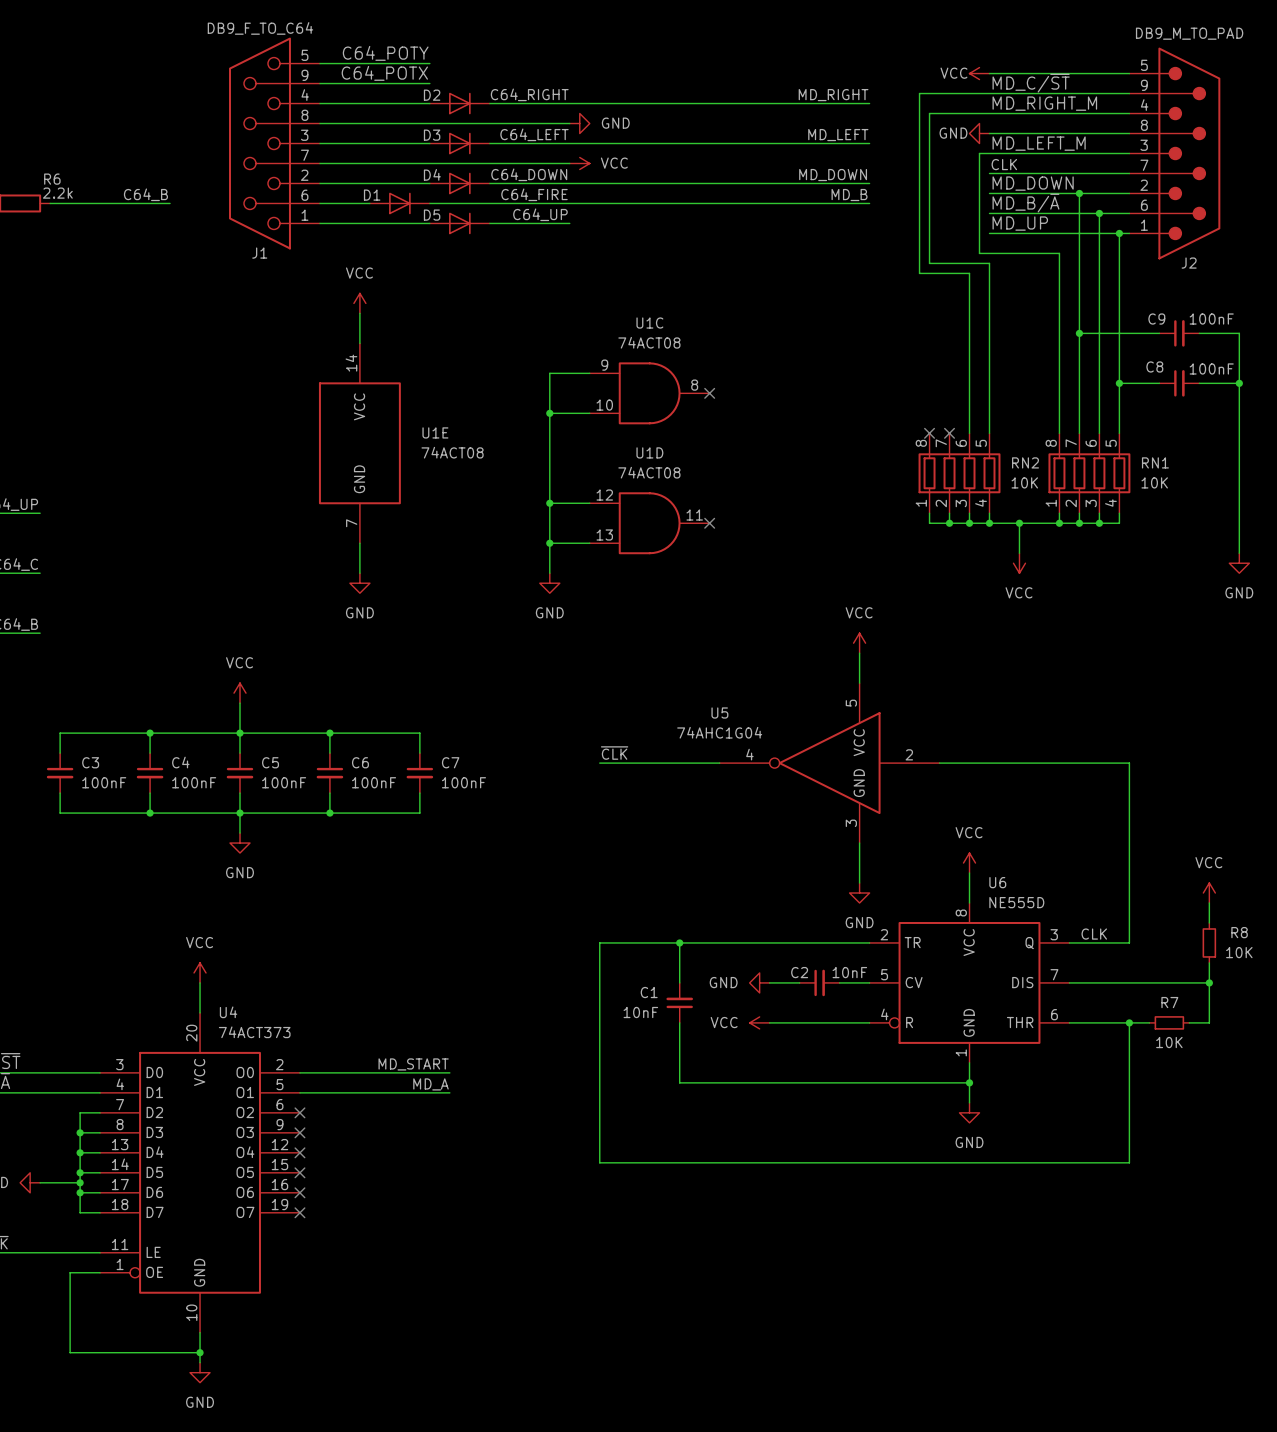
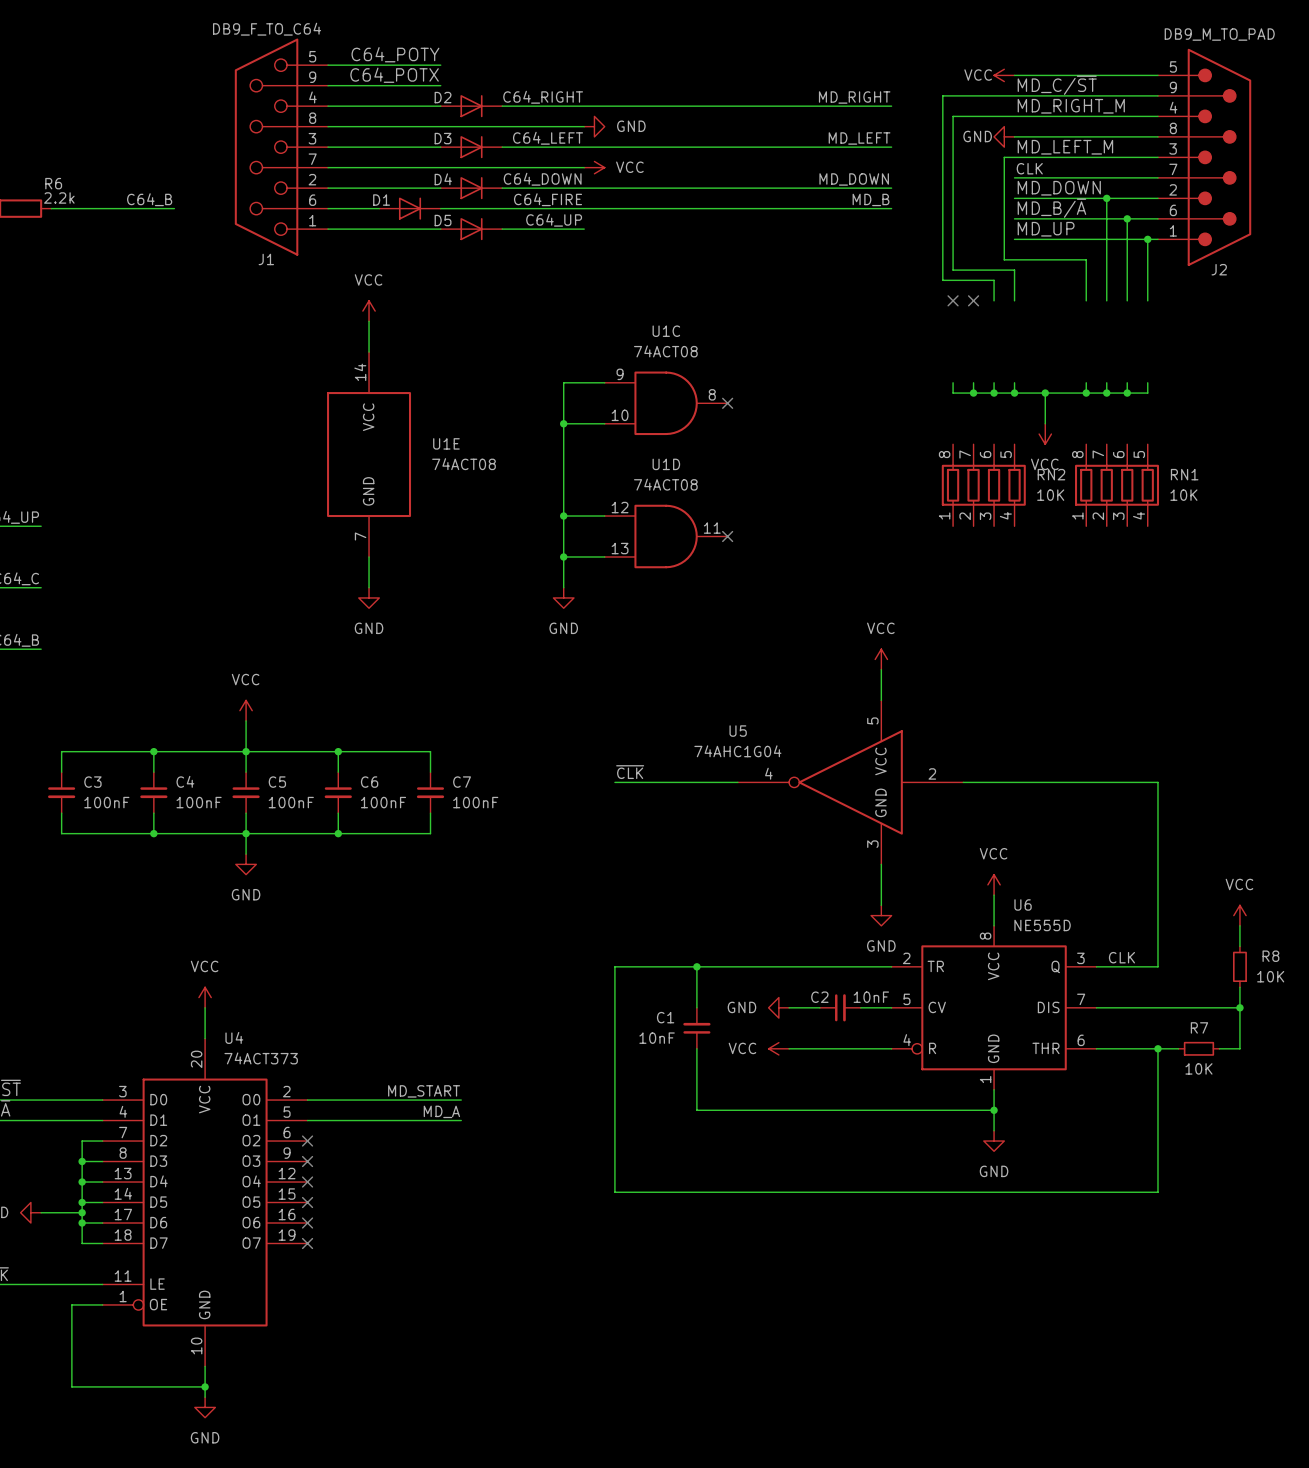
no-connect mark: none -> (953, 300)
no-connect mark: none -> (973, 300)
wire: (969, 293) (969, 373) -> none
wire: (989, 293) (989, 373) -> none
wire: (1059, 293) (1059, 373) -> none
wire: (1079, 293) (1079, 373) -> none
wire: (1099, 293) (1099, 373) -> none
wire: (1119, 293) (1119, 373) -> none
wire: (1079, 333) (1159, 333) -> none
junction: (1079, 333) -> none
C9: 100nF (1179, 333) -> none
wire: (1199, 333) (1239, 333) (1239, 553) -> none
wire: none -> (953, 382) (953, 393) (1147, 393)
junction: none -> (973, 393)
wire: (969, 383) (969, 433) -> none
junction: none -> (994, 393)
wire: (989, 383) (989, 433) -> none
junction: none -> (1014, 393)
junction: none -> (1045, 393)
wire: (1059, 383) (1059, 433) -> none
junction: none -> (1086, 393)
wire: (1079, 383) (1079, 433) -> none
junction: none -> (1106, 393)
wire: (1099, 383) (1099, 433) -> none
junction: none -> (1127, 393)
junction: (1119, 383) -> none
wire: (1159, 383) (1119, 383) (1119, 433) -> none
C8: 100nF (1179, 383) -> none
wire: (1199, 383) (1239, 383) -> none
junction: (1239, 383) -> none
no-connect mark: (929, 433) -> none
no-connect mark: (949, 433) -> none
wire: (929, 513) (929, 523) (1119, 523) (1119, 513) -> none
wire: (949, 513) (949, 523) -> (973, 382) (973, 393)
wire: (969, 513) (969, 523) -> none
wire: (989, 513) (989, 523) -> none
wire: (1059, 513) (1059, 523) -> none
wire: (1079, 513) (1079, 523) -> none
wire: (1099, 513) (1099, 523) -> none
junction: (949, 523) -> none
junction: (969, 523) -> none
junction: (989, 523) -> none
wire: (1019, 523) (1019, 553) -> (1045, 393) (1045, 423)
junction: (1019, 523) -> none
junction: (1059, 523) -> none
junction: (1079, 523) -> none
junction: (1099, 523) -> none
power symbol position: VCC (1019, 563) -> VCC (1045, 434)
power symbol: GND (1239, 563) -> none

